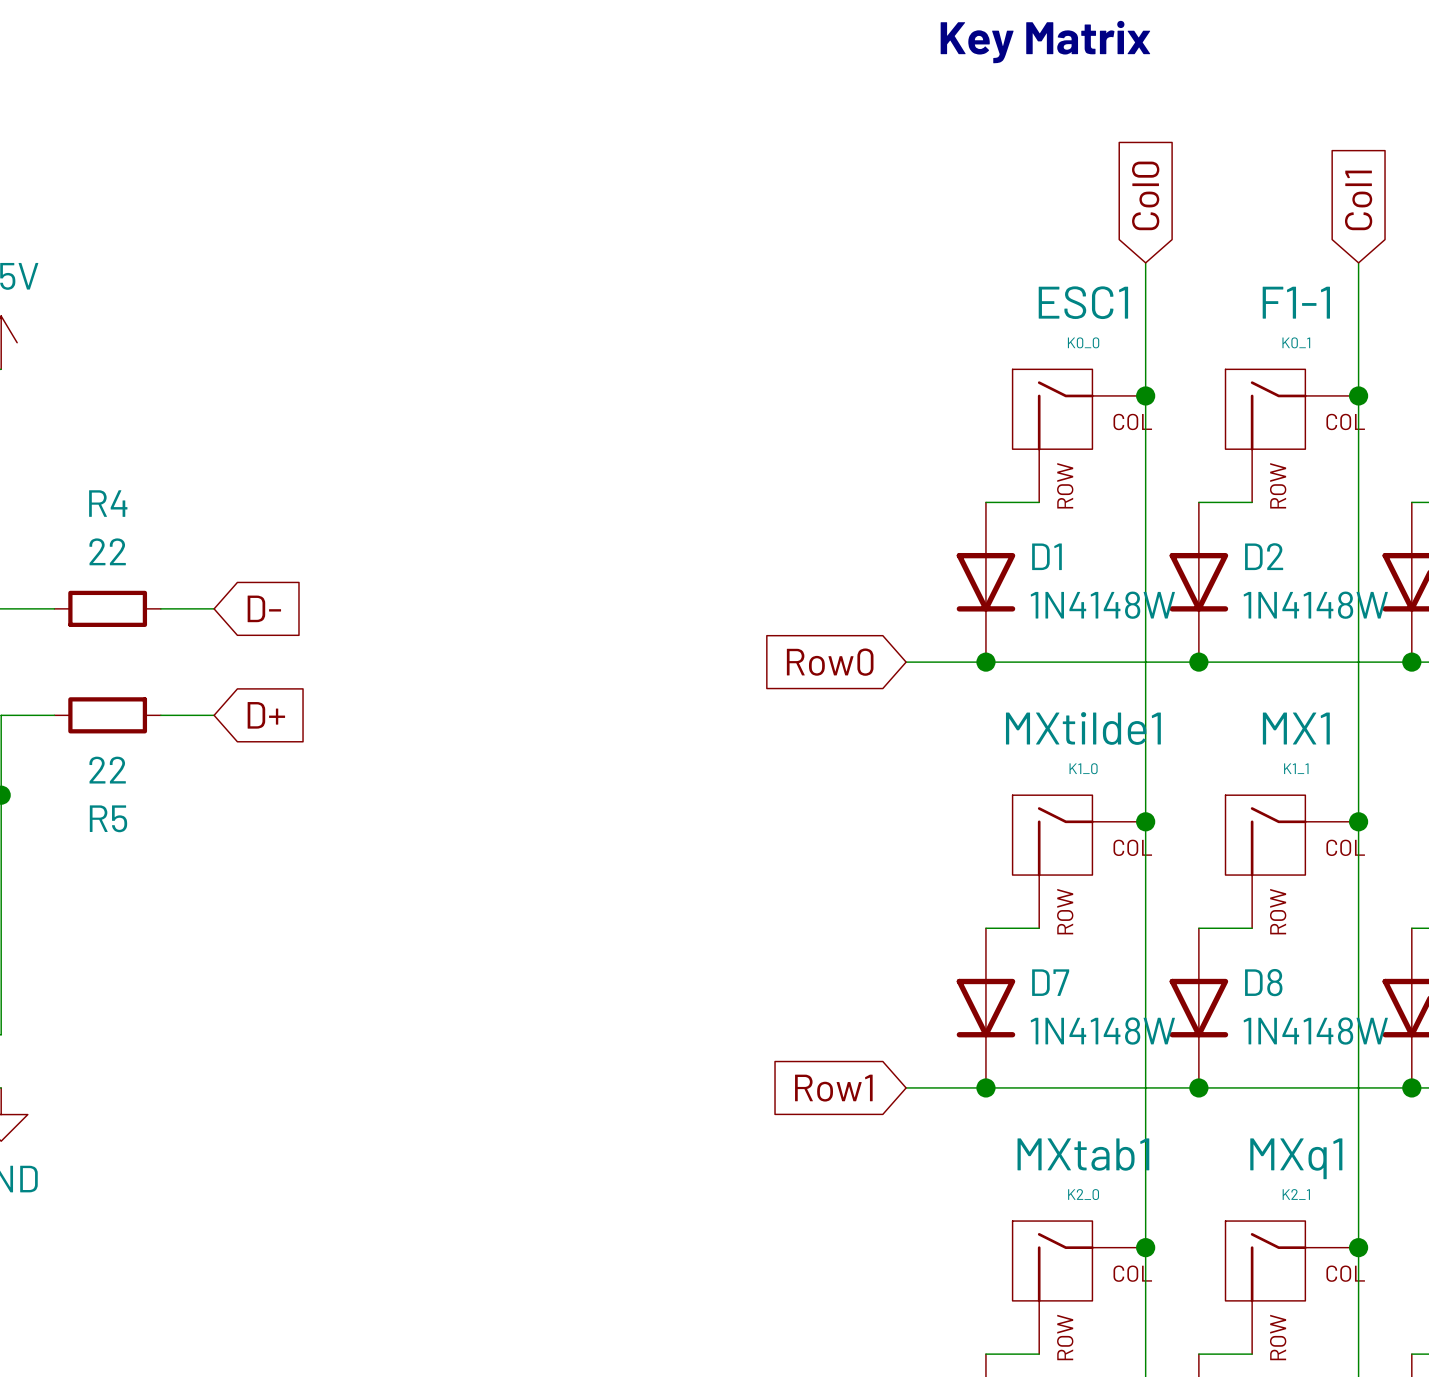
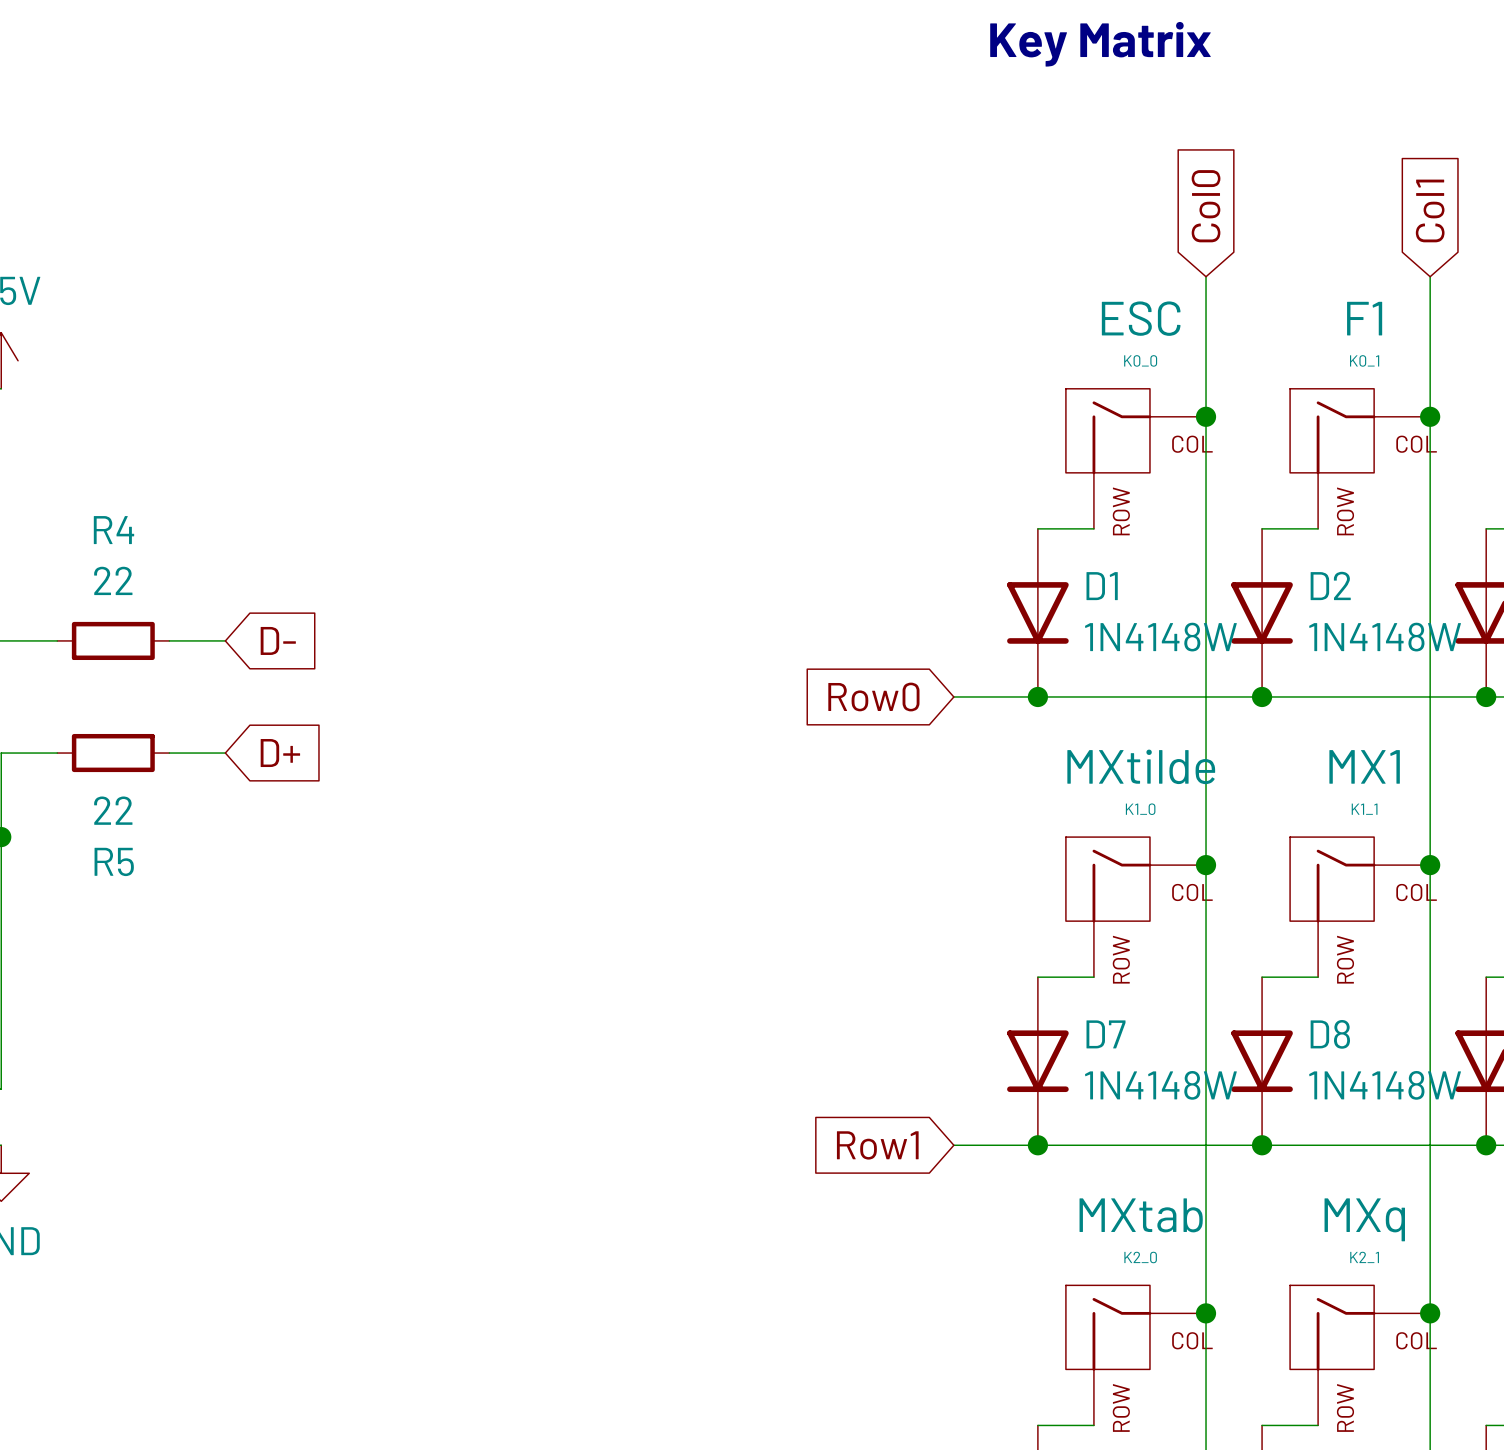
ESC1 name: ESC1 (1083, 302) -> ESC (1141, 318)
F1-1 name: F1-1 (1296, 302) -> F1 (1364, 318)
MXtilde1 name: MXtilde1 (1083, 728) -> MXtilde (1141, 766)
MXtab1 name: MXtab1 (1083, 1154) -> MXtab (1141, 1215)
MXq1 name: MXq1 (1296, 1158) -> MXq (1364, 1219)

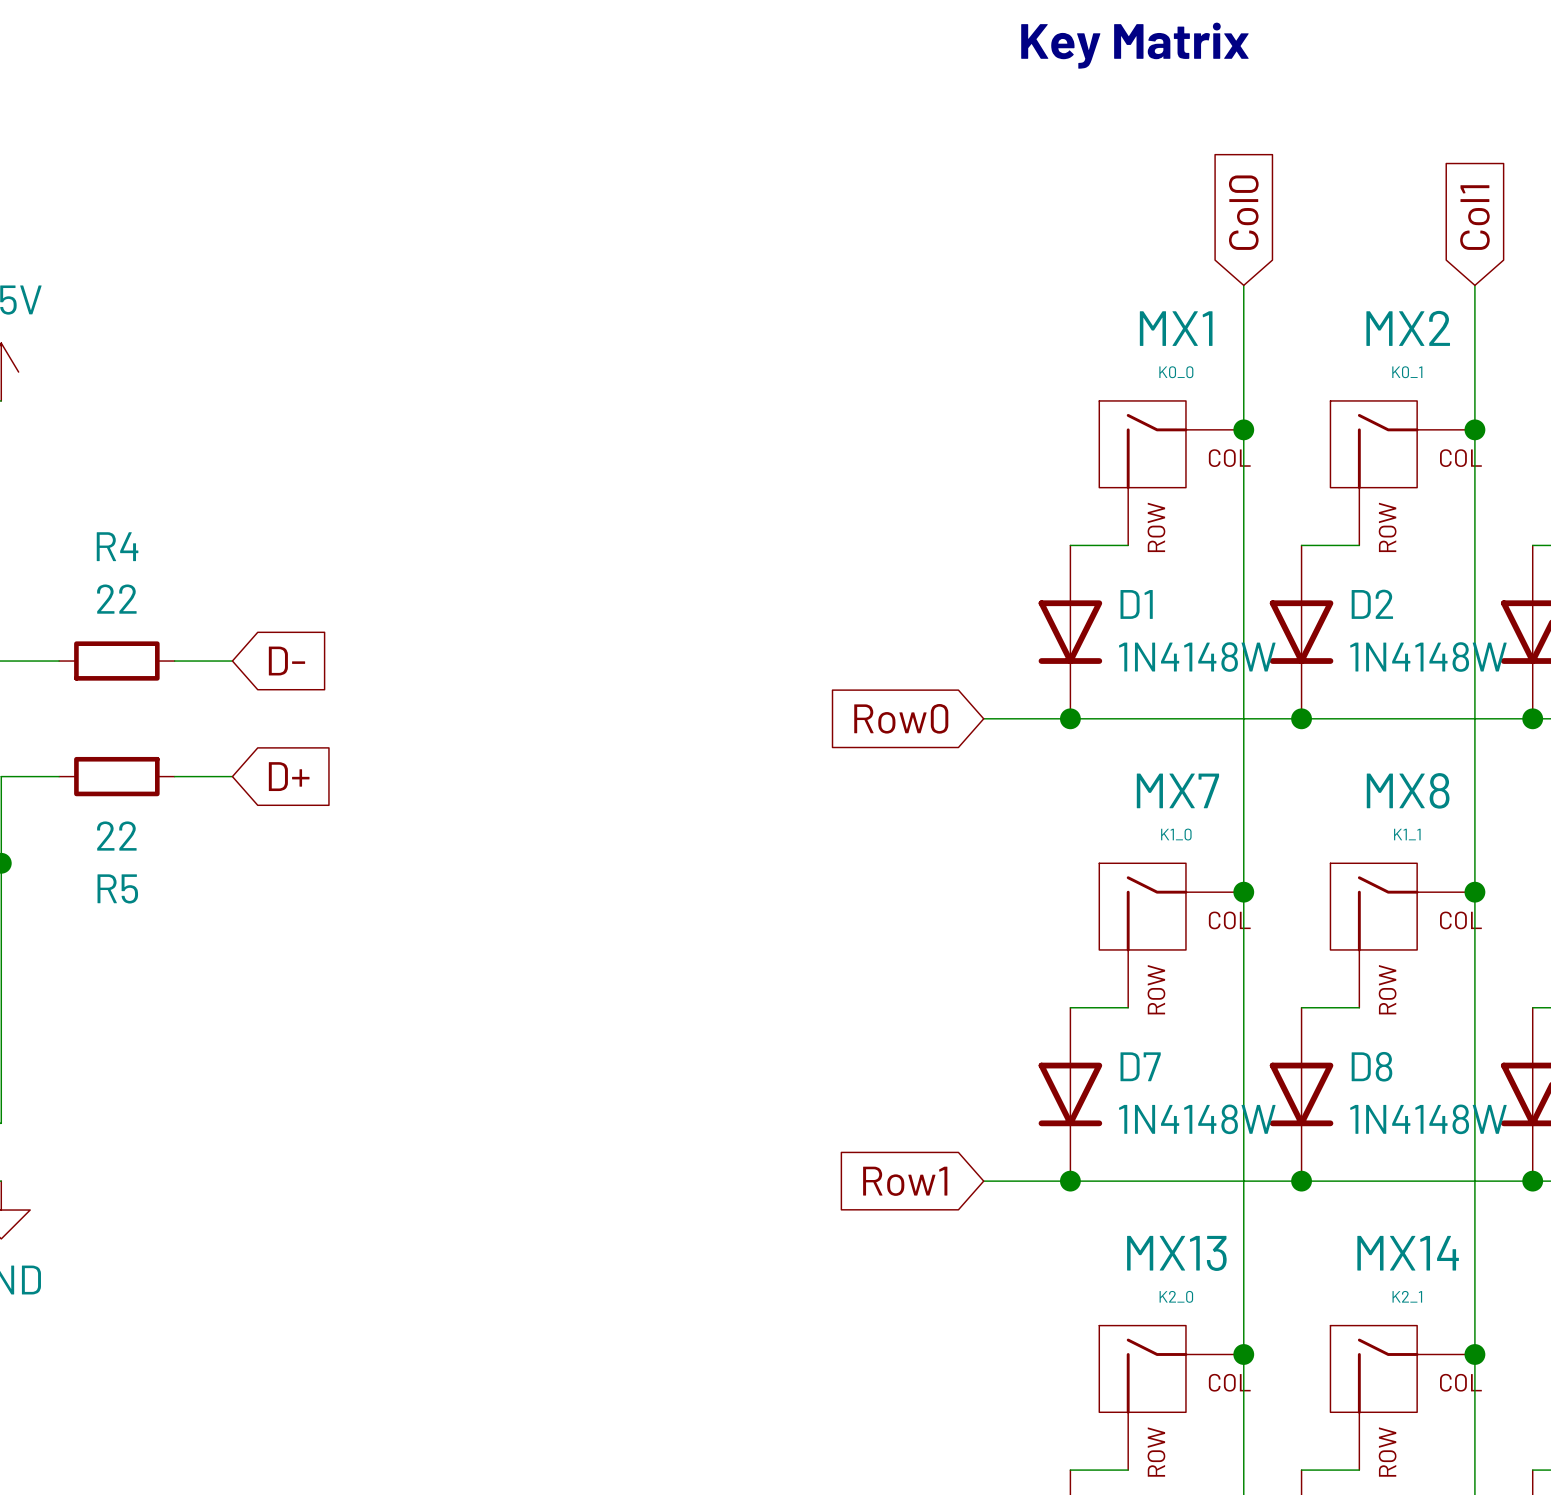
ESC name: ESC (1141, 318) -> MX1 (1176, 328)
F1 name: F1 (1364, 318) -> MX2 (1408, 328)
MXtilde name: MXtilde (1141, 766) -> MX7 (1177, 790)
MX1 name: MX1 (1364, 766) -> MX8 (1408, 790)
MXtab name: MXtab (1141, 1215) -> MX13 (1176, 1253)
MXq name: MXq (1364, 1219) -> MX14 (1408, 1253)

